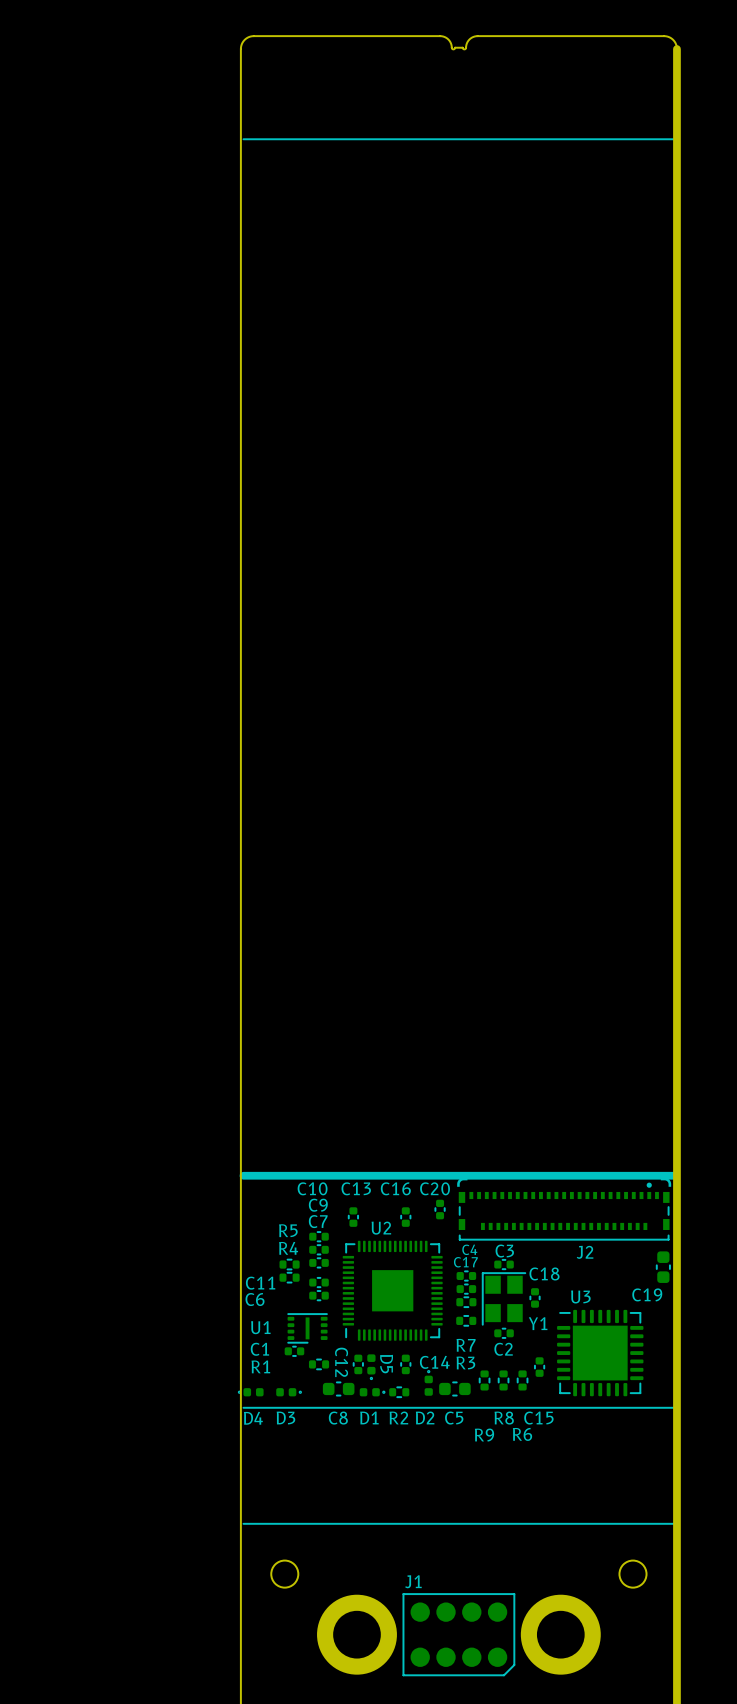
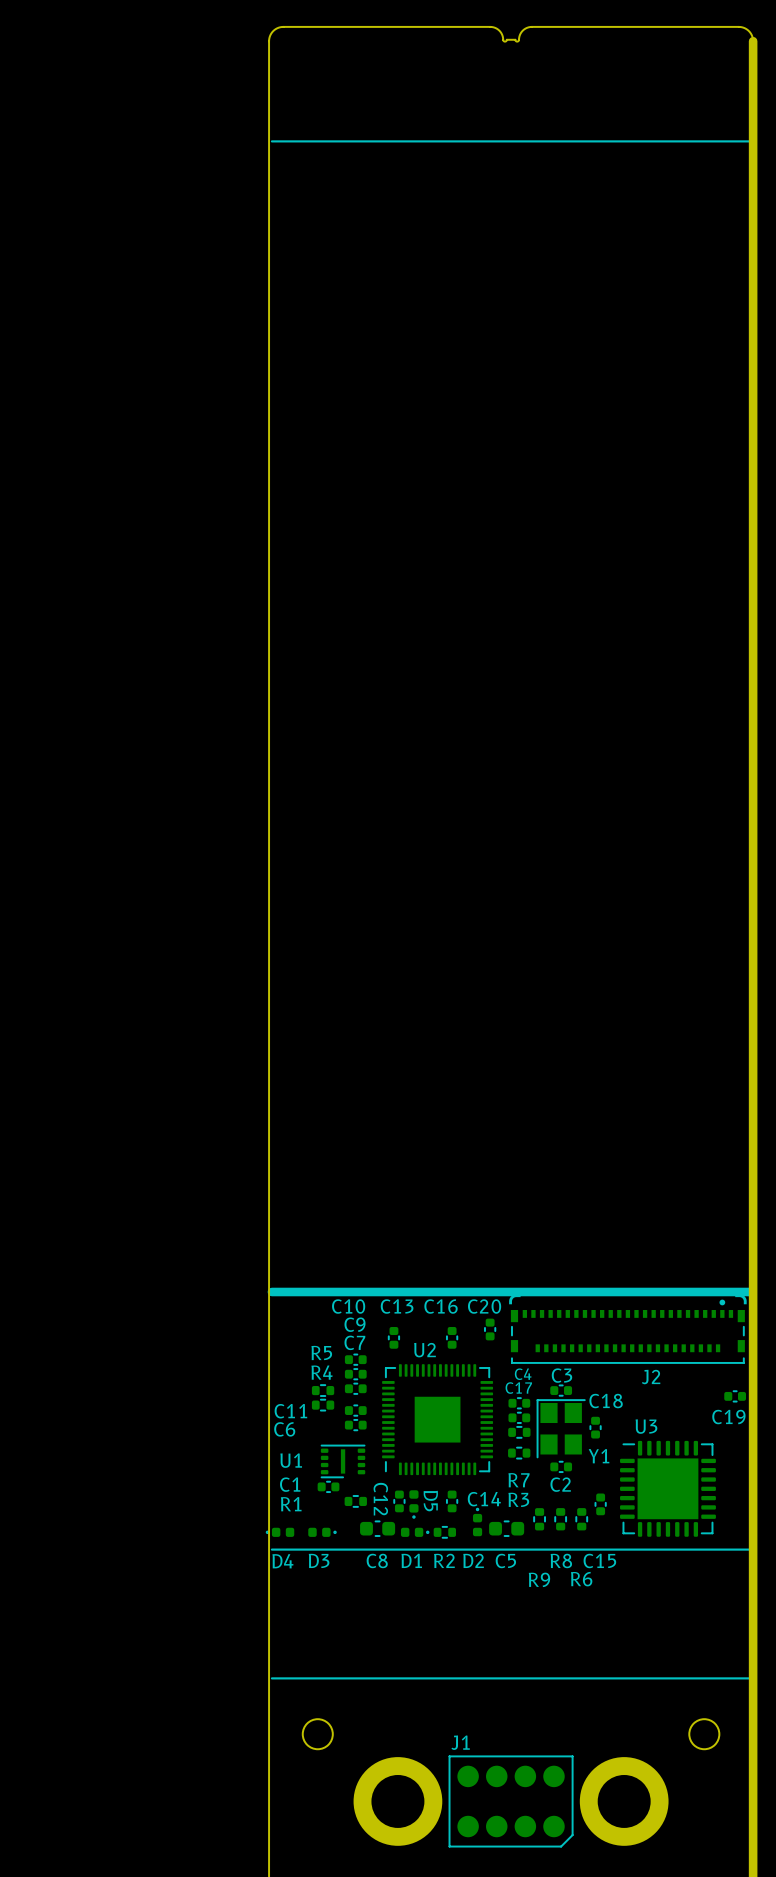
C19 footprint: [656, 1251, 671, 1283] -> [724, 1390, 747, 1403]

